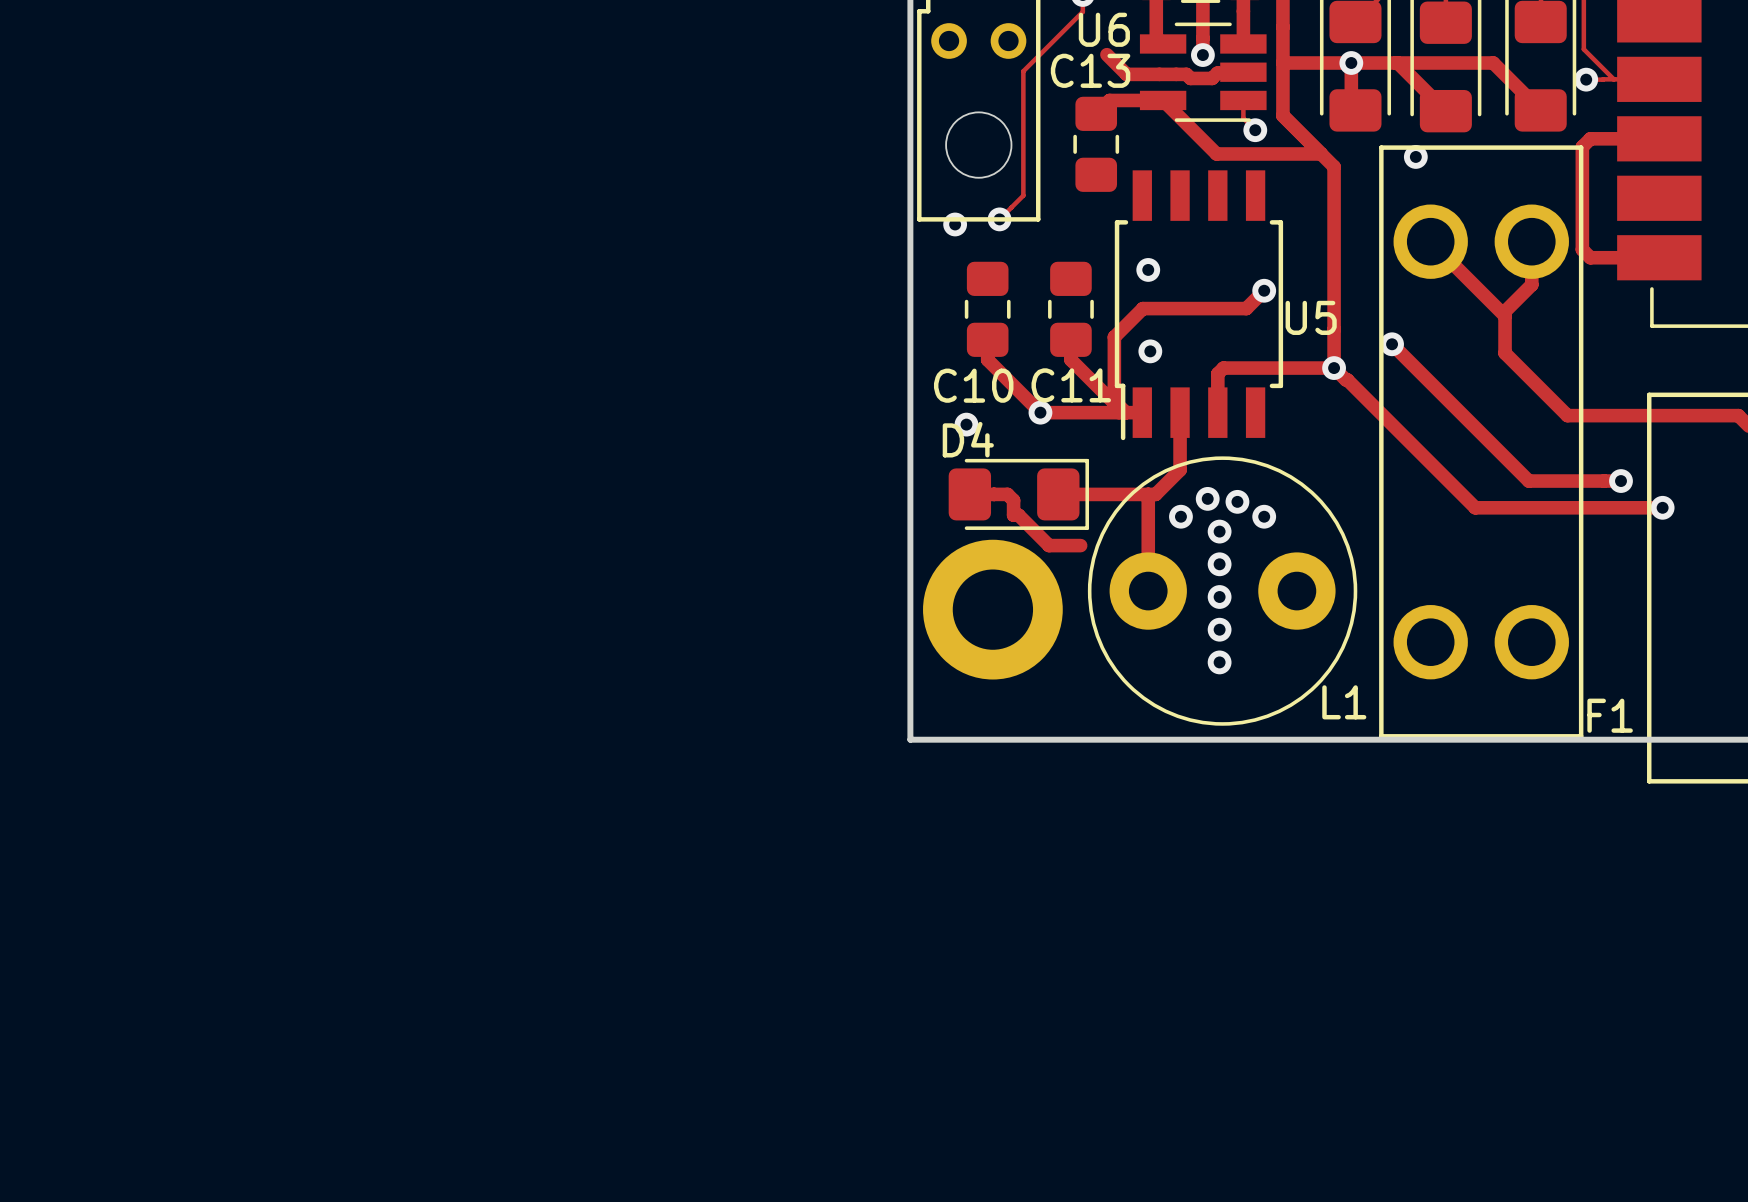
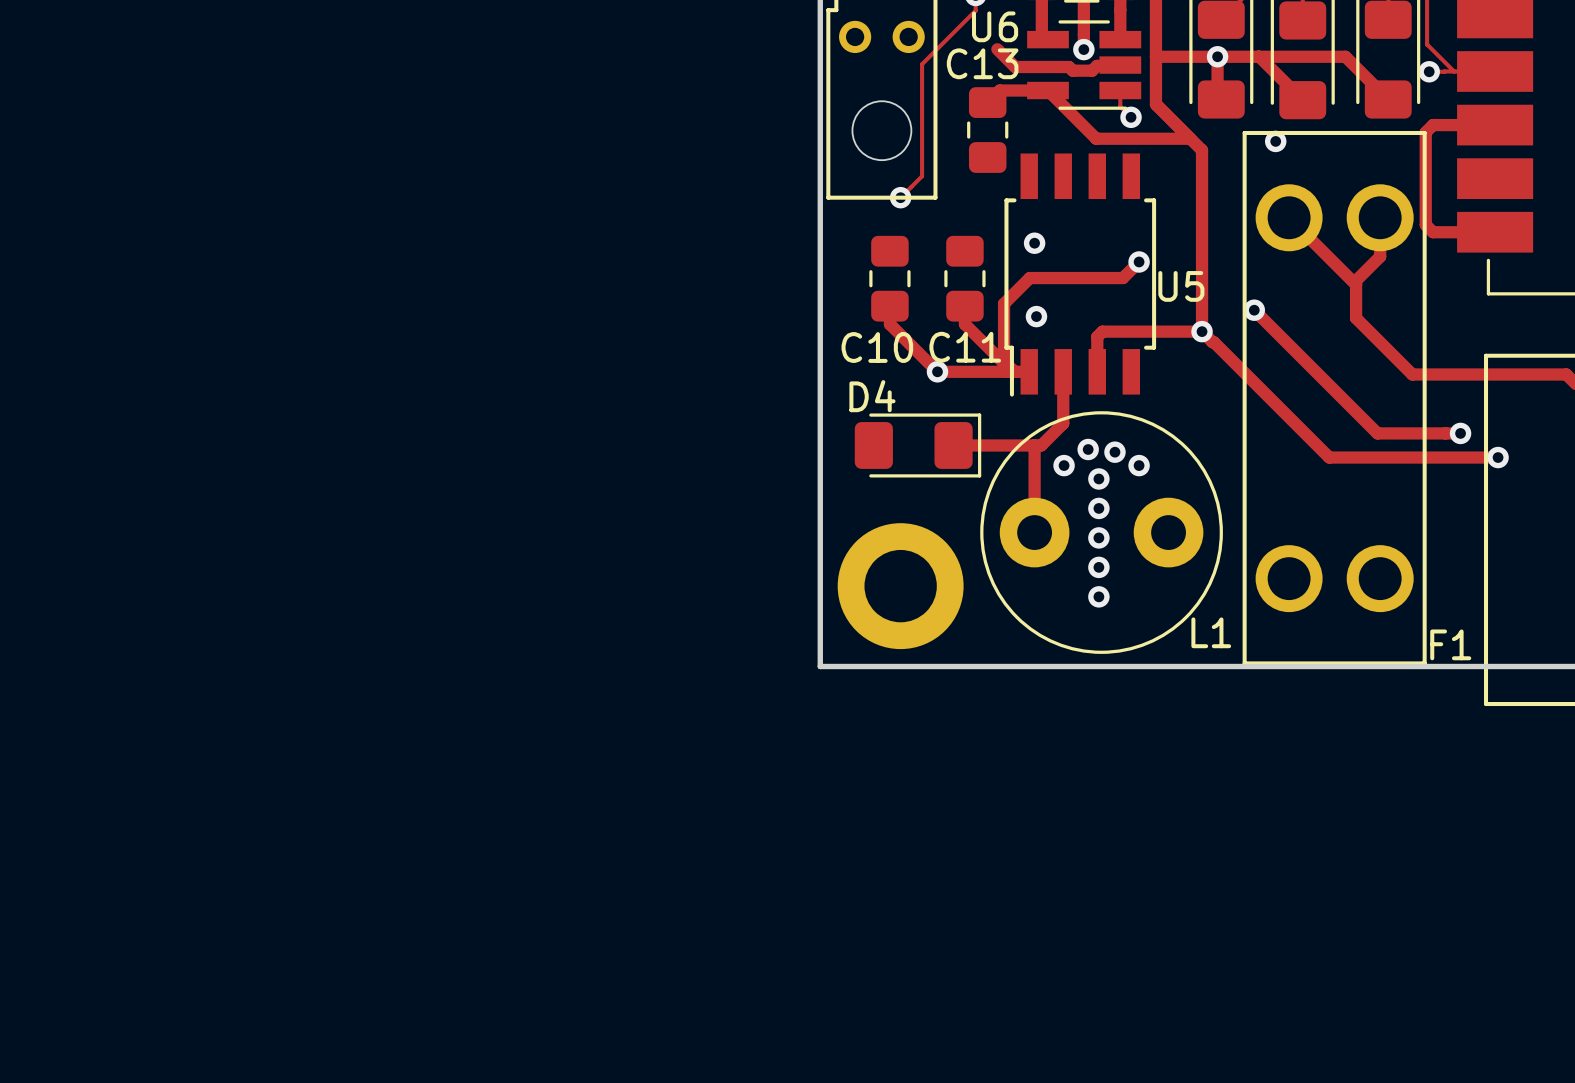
via: (955, 224) -> none
via: (966, 424) -> none
track: (969, 494) (1007, 494) (1013, 500) (1013, 515) (1018, 515) (1049, 545) (1080, 545) -> none
part position: (992, 609) -> (900, 586)

